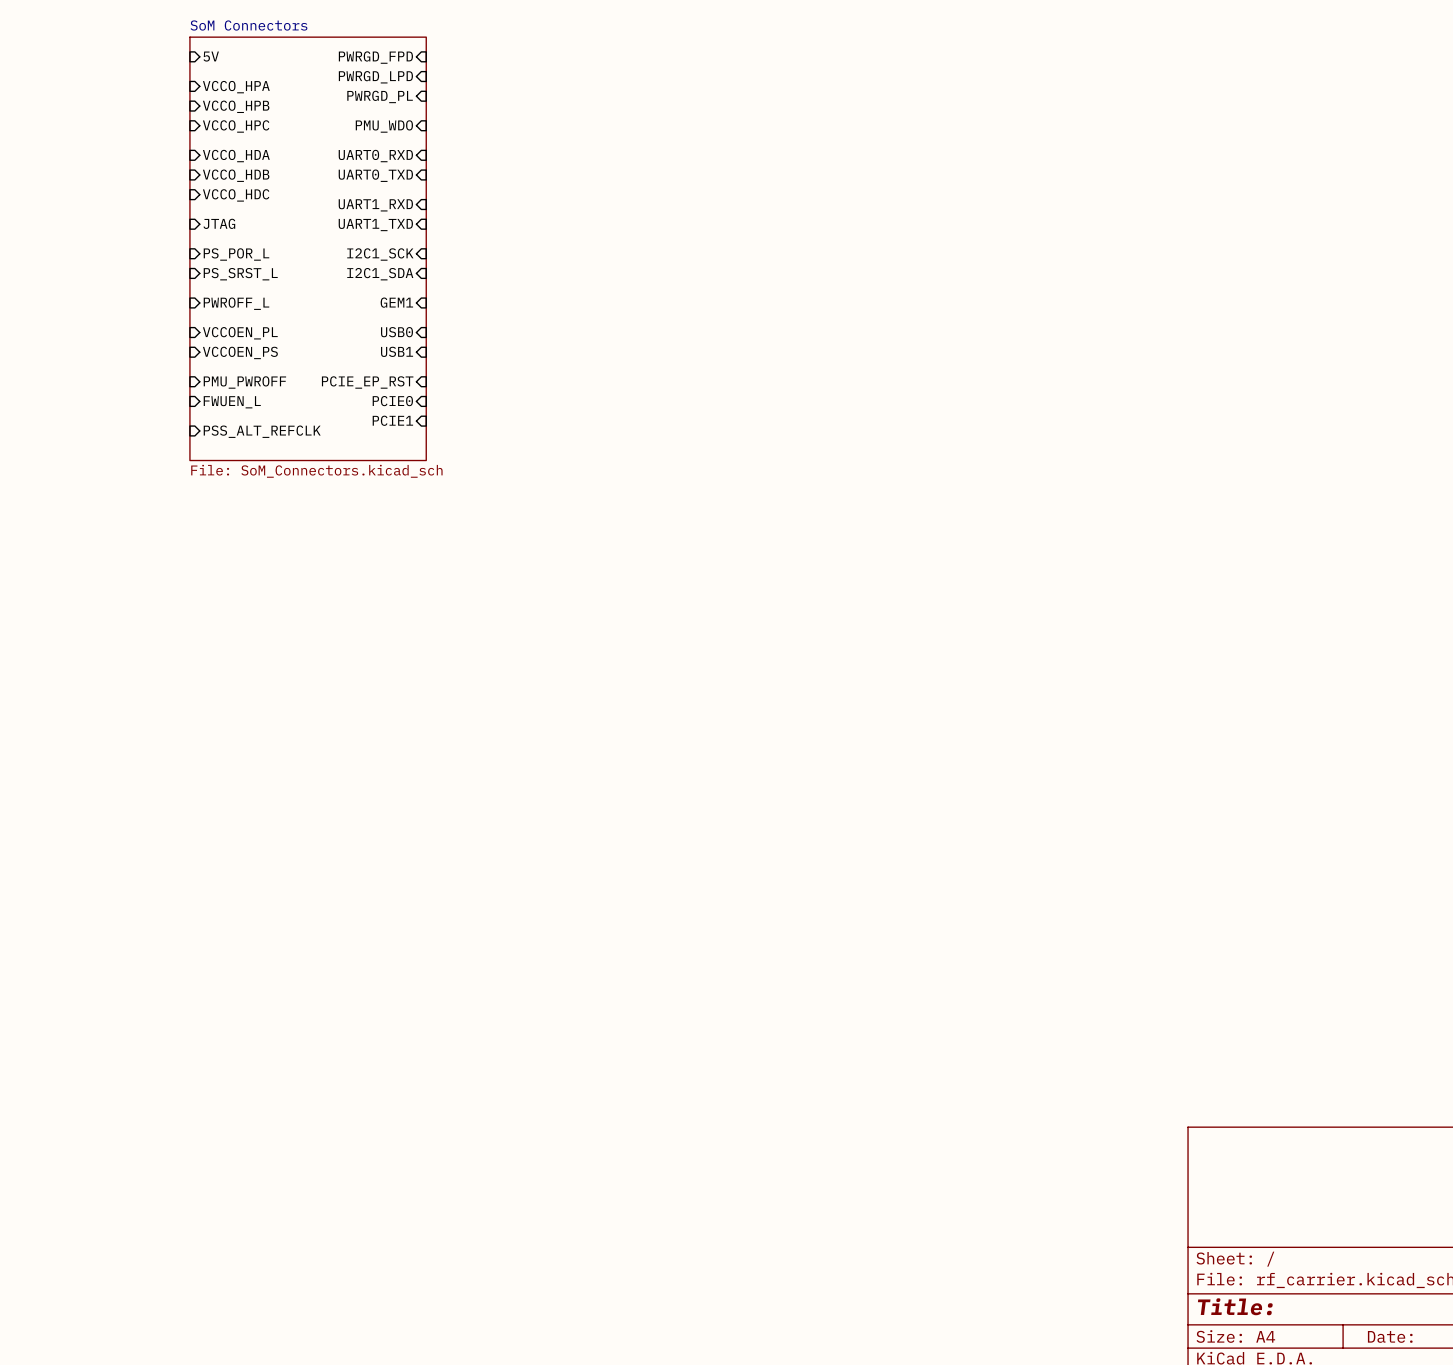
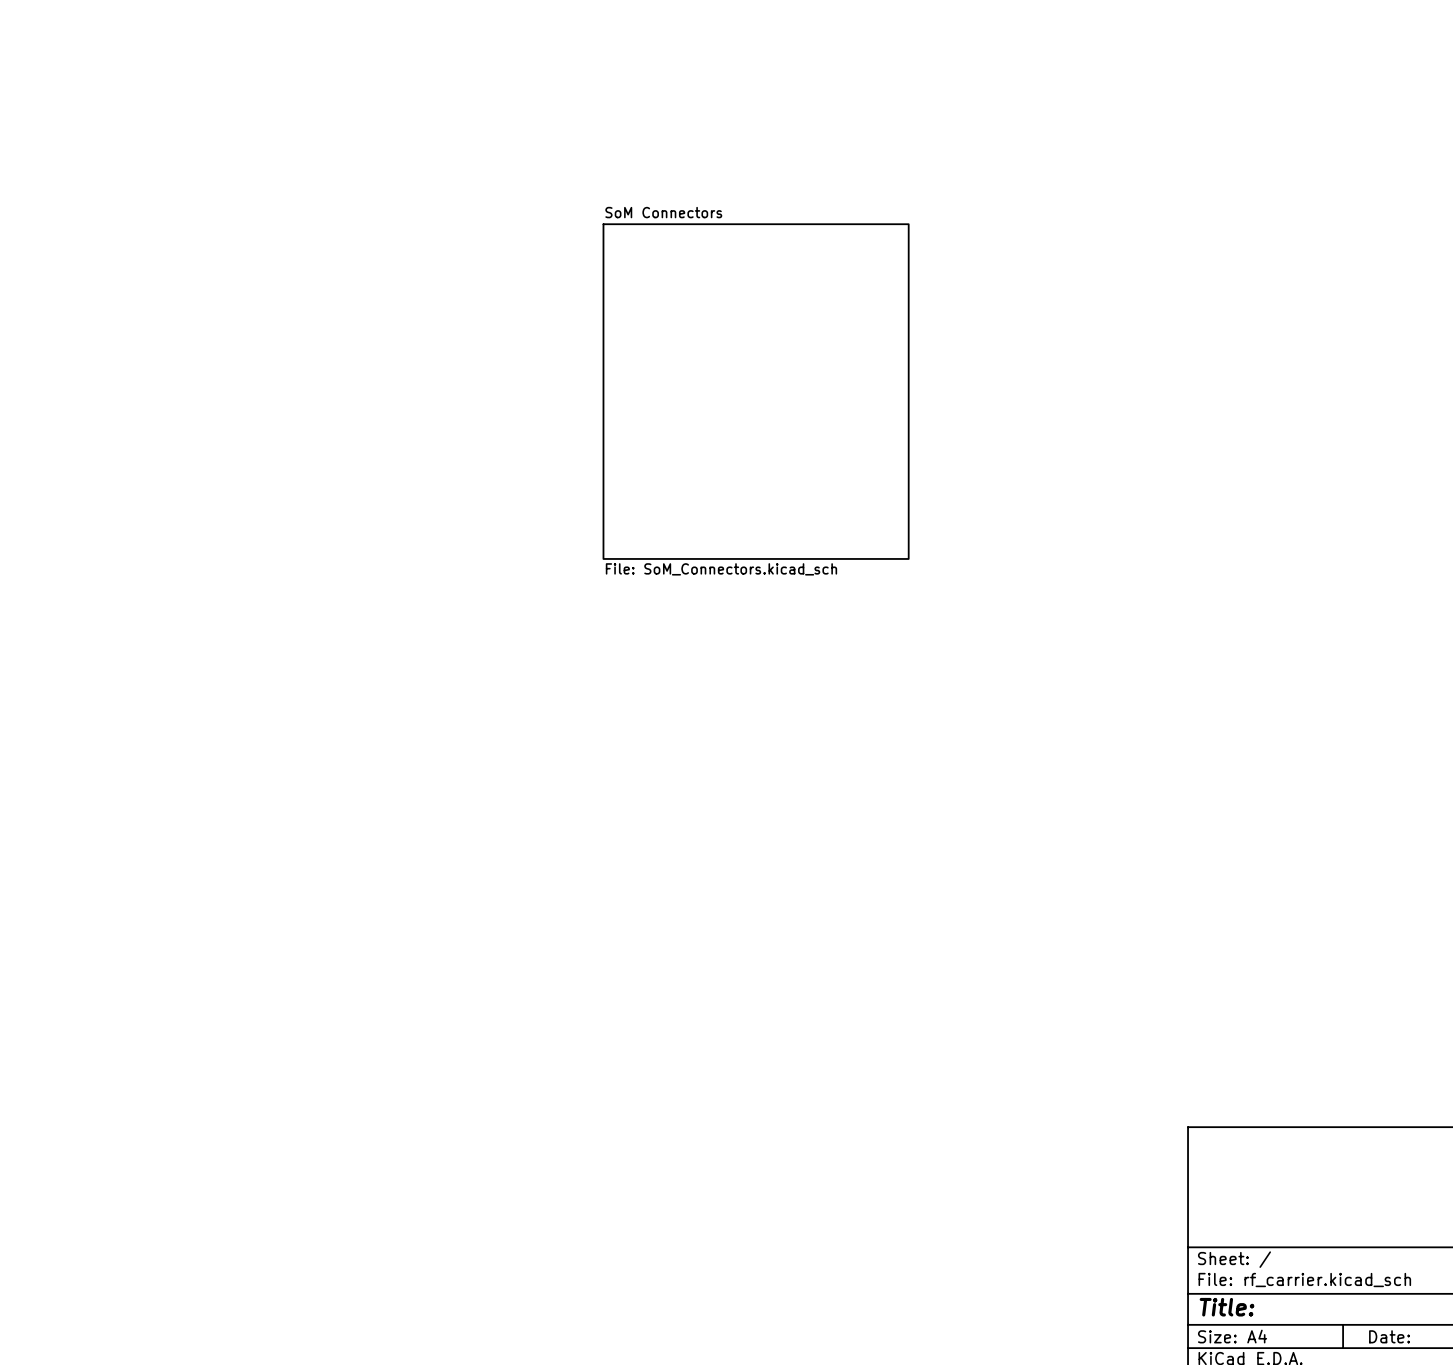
sheet pin: 5V (211, 56) -> none
sheet pin: PWRGD_FPD (375, 57) -> none
sheet pin: PWRGD_LPD (375, 77) -> none
sheet pin: VCCO_HPA (236, 87) -> none
sheet pin: PWRGD_PL (380, 96) -> none
sheet pin: VCCO_HPB (236, 106) -> none
sheet pin: VCCO_HPC (236, 126) -> none
sheet pin: PMU_WDO (384, 126) -> none
sheet pin: VCCO_HDA (236, 156) -> none
sheet pin: UART0_RXD (375, 156) -> none
sheet pin: VCCO_HDB (236, 175) -> none
sheet pin: UART0_TXD (375, 175) -> none
sheet pin: VCCO_HDC (236, 195) -> none
sheet pin: UART1_RXD (375, 205) -> none
sheet pin: JTAG (219, 223) -> none
sheet pin: UART1_TXD (375, 225) -> none
sheet SoM Connectors: File: SoM_Connectors.kicad_sch (308, 248) -> none
sheet pin: PS_POR_L (236, 254) -> none
sheet pin: I2C1_SCK (380, 254) -> none
sheet pin: PS_SRST_L (240, 274) -> none
sheet pin: I2C1_SDA (380, 274) -> none
sheet pin: GEM1 (396, 302) -> none
sheet pin: PWROFF_L (236, 303) -> none
sheet pin: USB0 (396, 332) -> none
sheet pin: VCCOEN_PL (240, 333) -> none
sheet pin: USB1 (397, 351) -> none
sheet pin: VCCOEN_PS (240, 352) -> none
sheet pin: PMU_PWROFF (244, 382) -> none
sheet pin: PCIE_EP_RST (367, 382) -> none
sheet SoM Connectors: none -> File: SoM_Connectors.kicad_sch (756, 391)
sheet pin: PCIE0 (392, 401) -> none
sheet pin: FWUEN_L (232, 402) -> none
sheet pin: PCIE1 (392, 420) -> none
sheet pin: PSS_ALT_REFCLK (262, 431) -> none

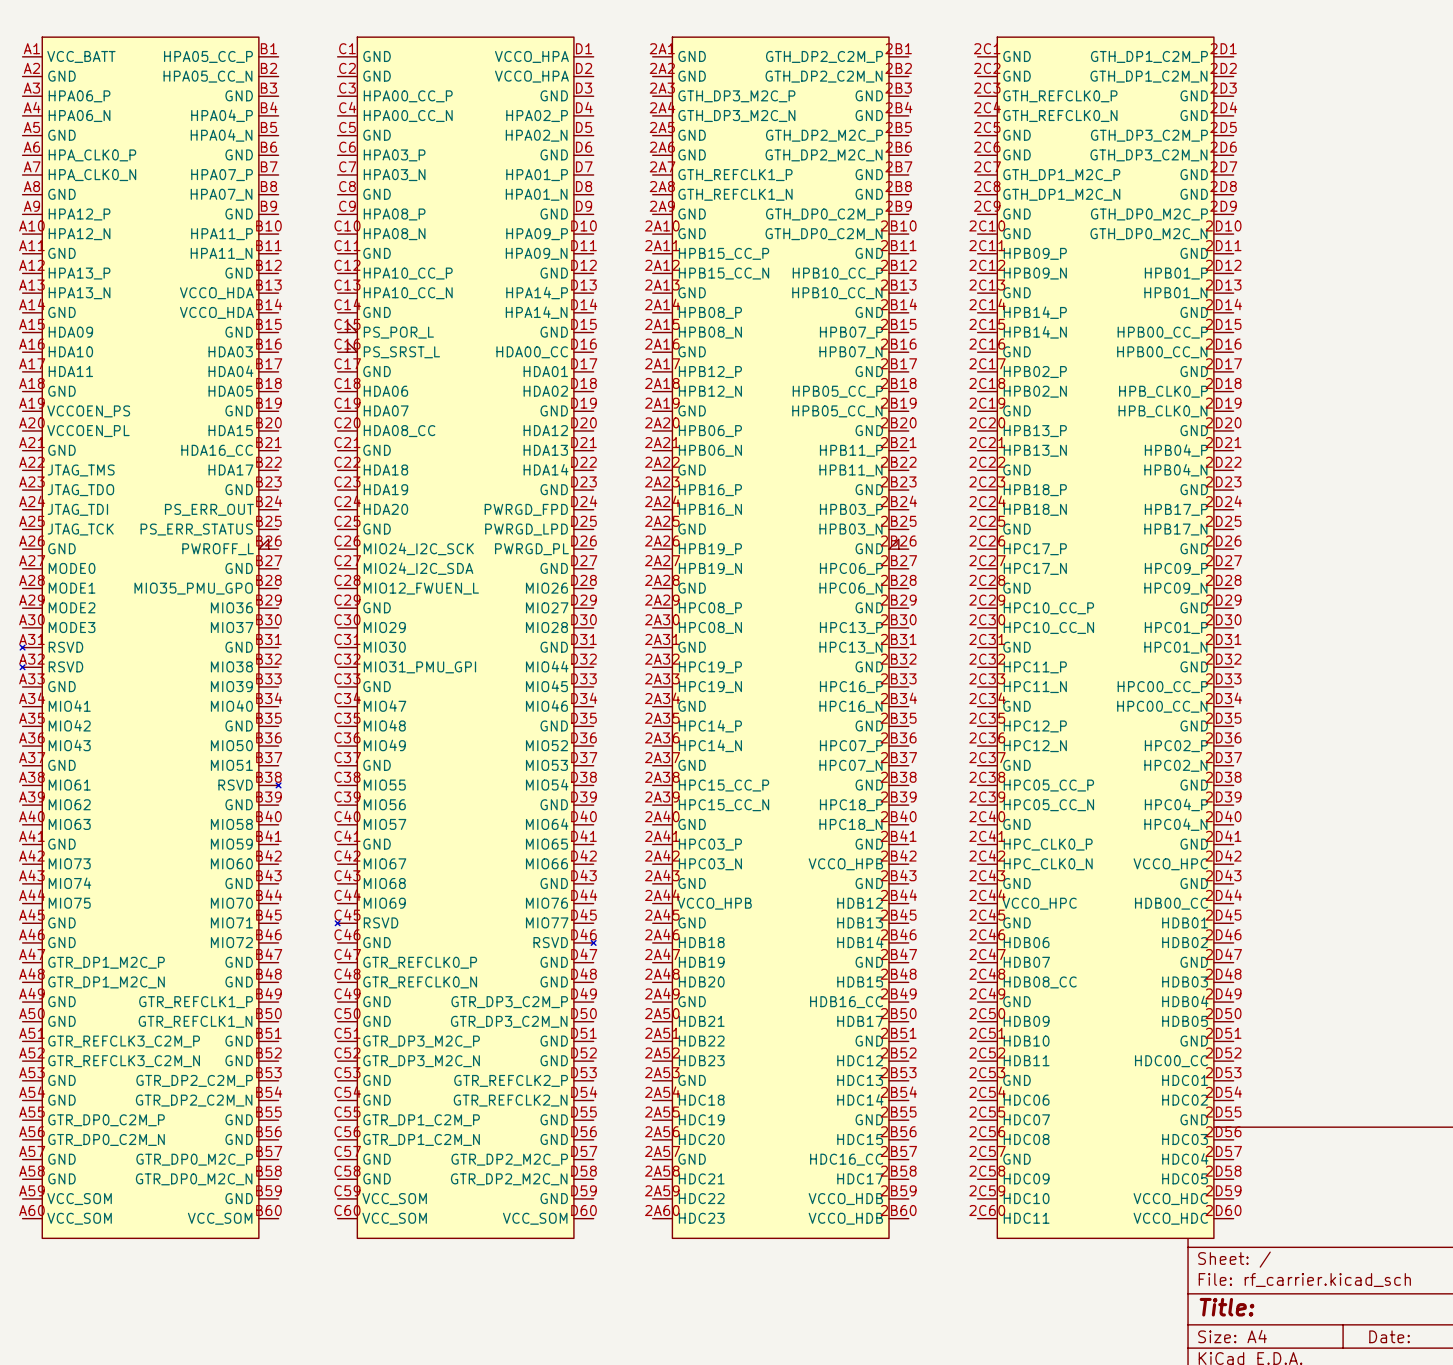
sheet SoM Connectors: File: SoM_Connectors.kicad_sch (756, 391) -> none
part: none -> (150, 637)
part: none -> (465, 637)
part: none -> (780, 637)
part: none -> (1105, 637)

